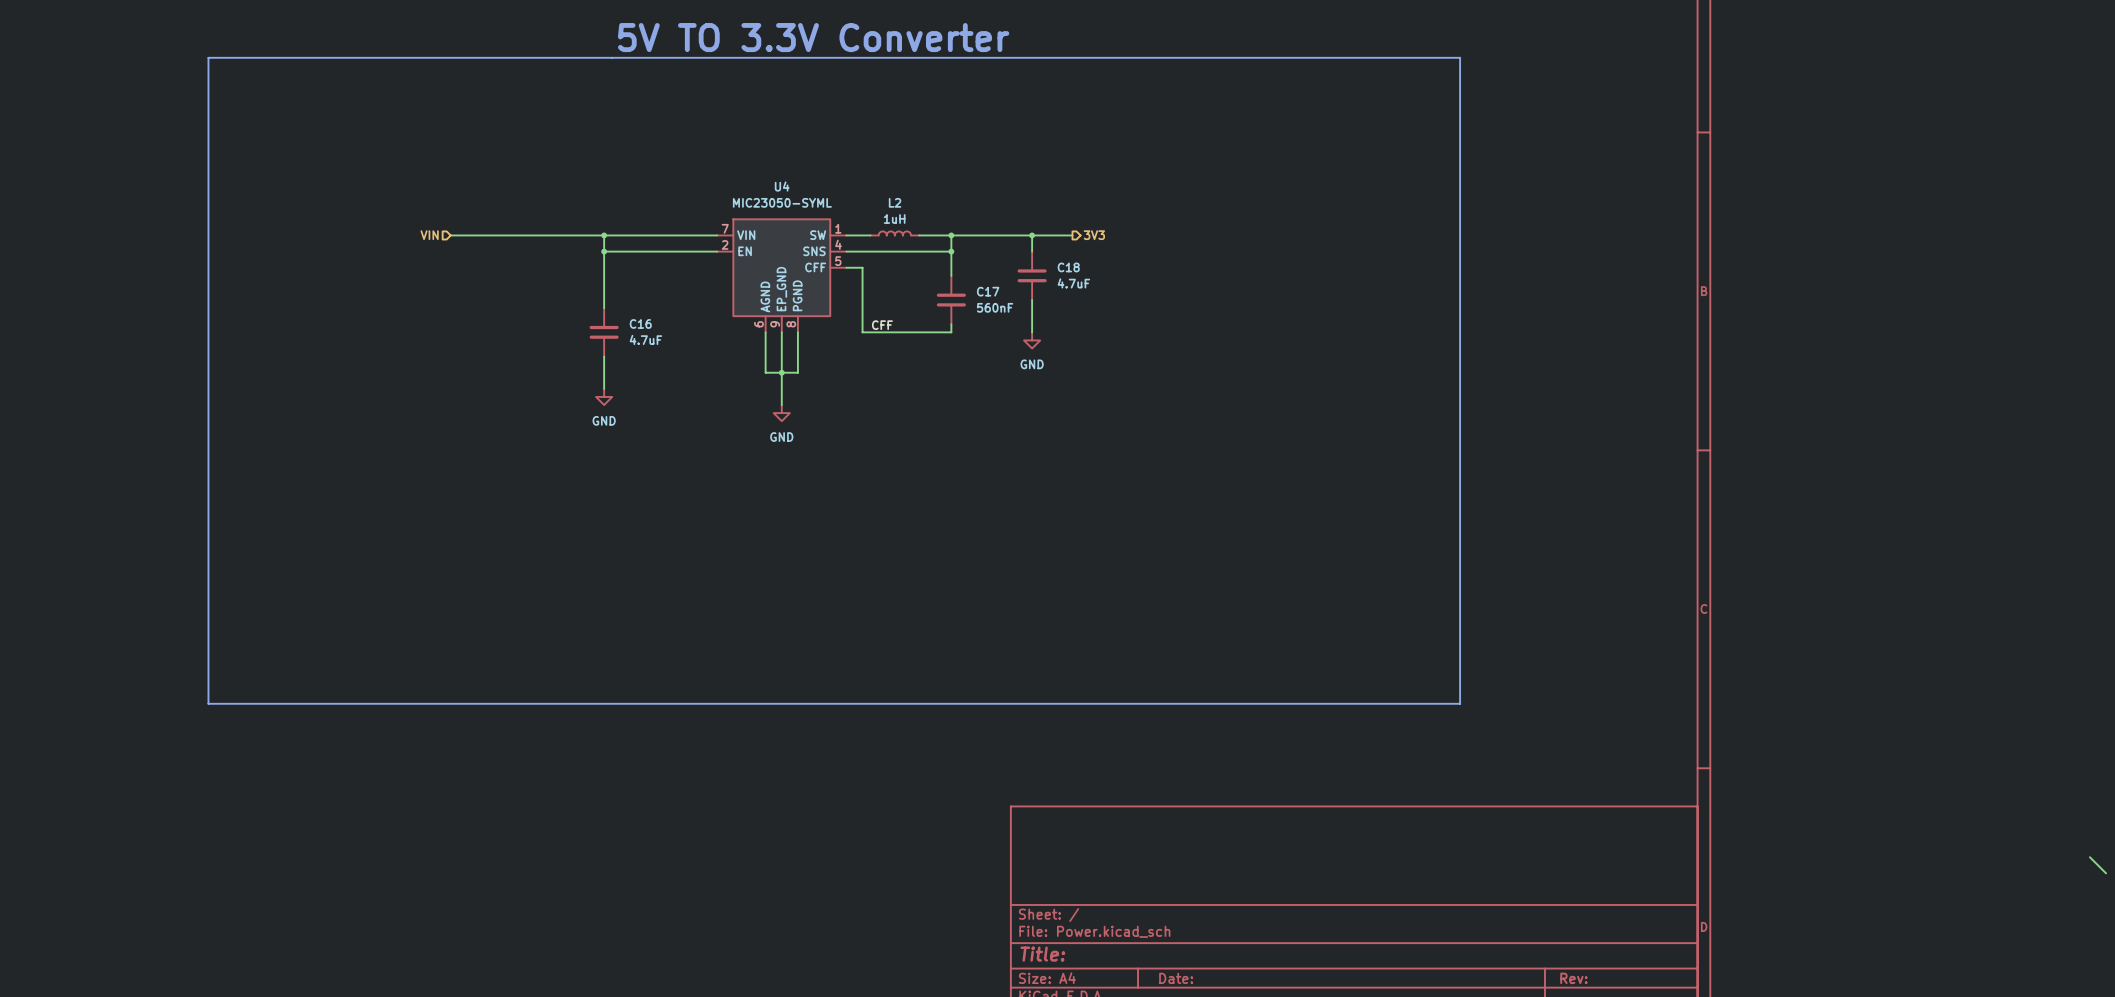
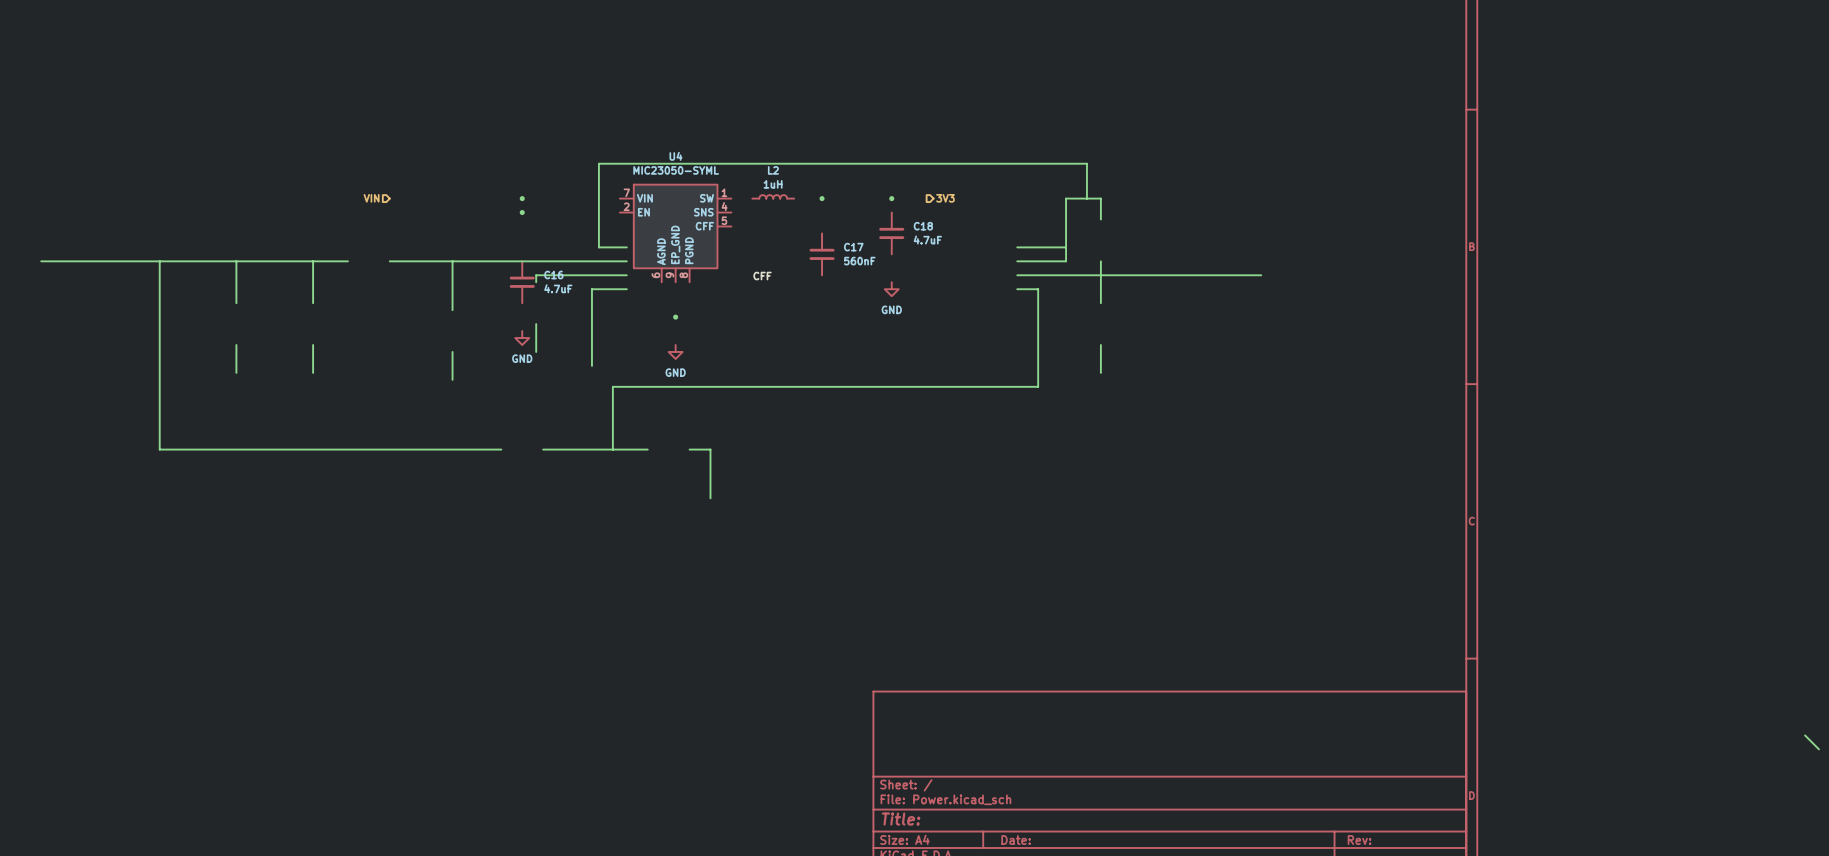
text: 5V TO 3.3V Converter (813, 37) -> none
line: (208, 57) (1460, 57) (1460, 703) (208, 703) (208, 57) -> none
wire: (450, 235) (717, 235) -> none
wire: (604, 235) (604, 308) -> none
wire: (846, 235) (870, 235) -> none
wire: (919, 235) (1072, 235) -> none
wire: (951, 235) (951, 275) -> none
wire: (1032, 235) (1032, 251) -> none
wire: none -> (1086, 198) (1086, 163) (598, 163) (598, 247) (626, 247)
wire: (604, 251) (717, 251) -> none
wire: (846, 251) (951, 251) -> none
junction: (951, 251) -> none
wire: none -> (1100, 219) (1100, 198) (1066, 198) (1066, 261) (1017, 261)
wire: (846, 267) (862, 267) (862, 332) (951, 332) (951, 324) -> none
wire: none -> (1017, 247) (1066, 247)
wire: (1032, 300) (1032, 332) -> none
wire: none -> (41, 261) (347, 261)
wire: none -> (159, 261) (159, 449) (501, 449)
wire: none -> (236, 261) (236, 303)
wire: none -> (313, 261) (313, 303)
wire: none -> (389, 261) (626, 261)
wire: none -> (452, 261) (452, 310)
wire: none -> (1100, 261) (1100, 303)
wire: none -> (626, 275) (536, 275) (536, 282)
wire: none -> (1017, 275) (1261, 275)
wire: (765, 332) (765, 372) (797, 372) (797, 332) -> none
wire: (781, 332) (781, 405) -> none
wire: none -> (626, 289) (591, 289) (591, 365)
wire: none -> (1017, 289) (1038, 289) (1038, 386) (612, 386) (612, 449)
wire: (604, 356) (604, 388) -> (536, 324) (536, 351)
wire: none -> (236, 344) (236, 372)
wire: none -> (313, 344) (313, 372)
wire: none -> (1100, 344) (1100, 372)
wire: none -> (452, 351) (452, 379)
wire: none -> (543, 449) (647, 449)
wire: none -> (689, 449) (710, 449) (710, 498)

